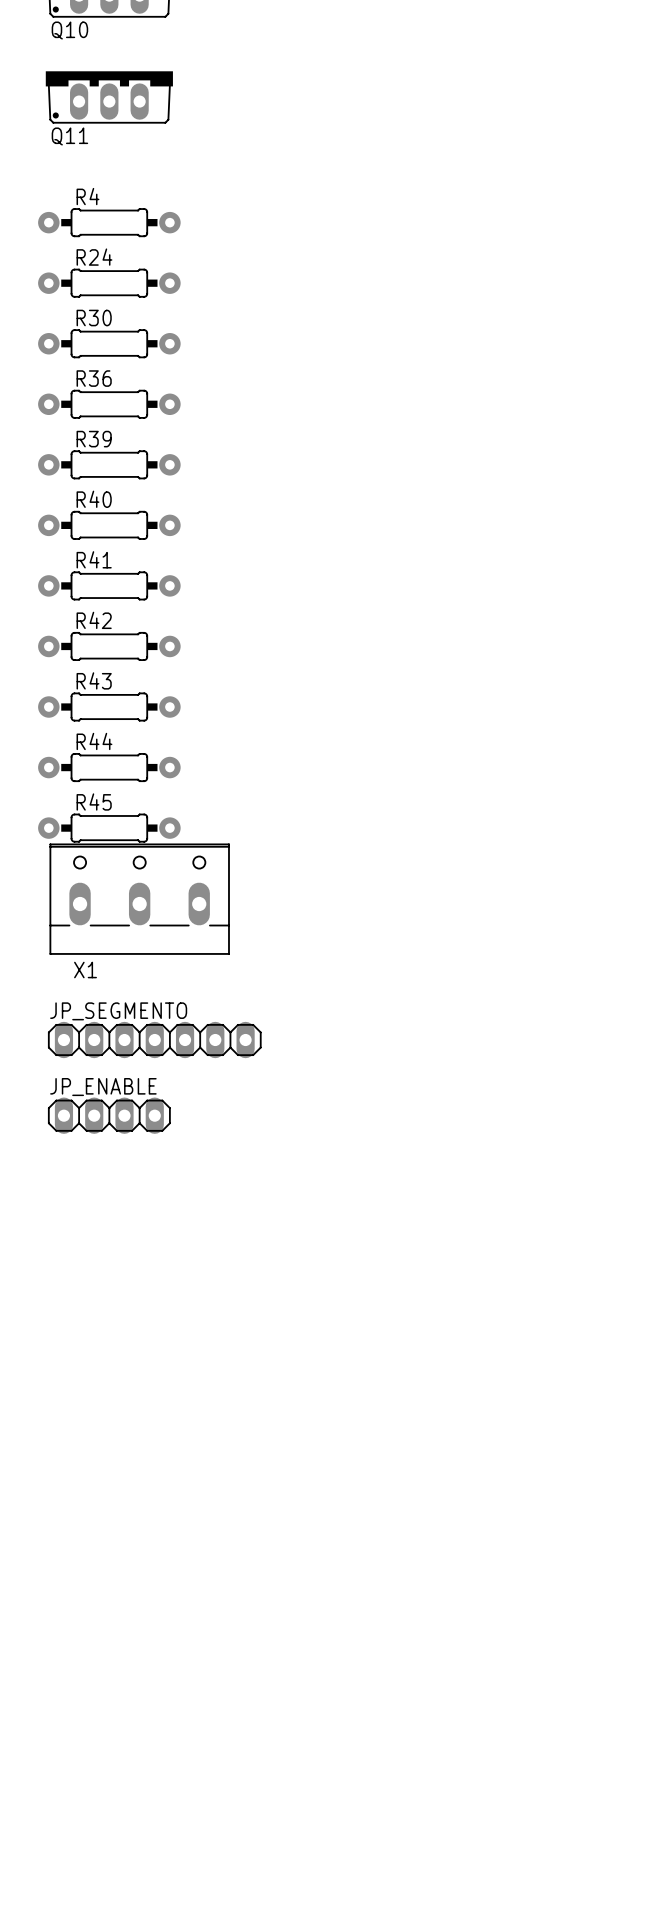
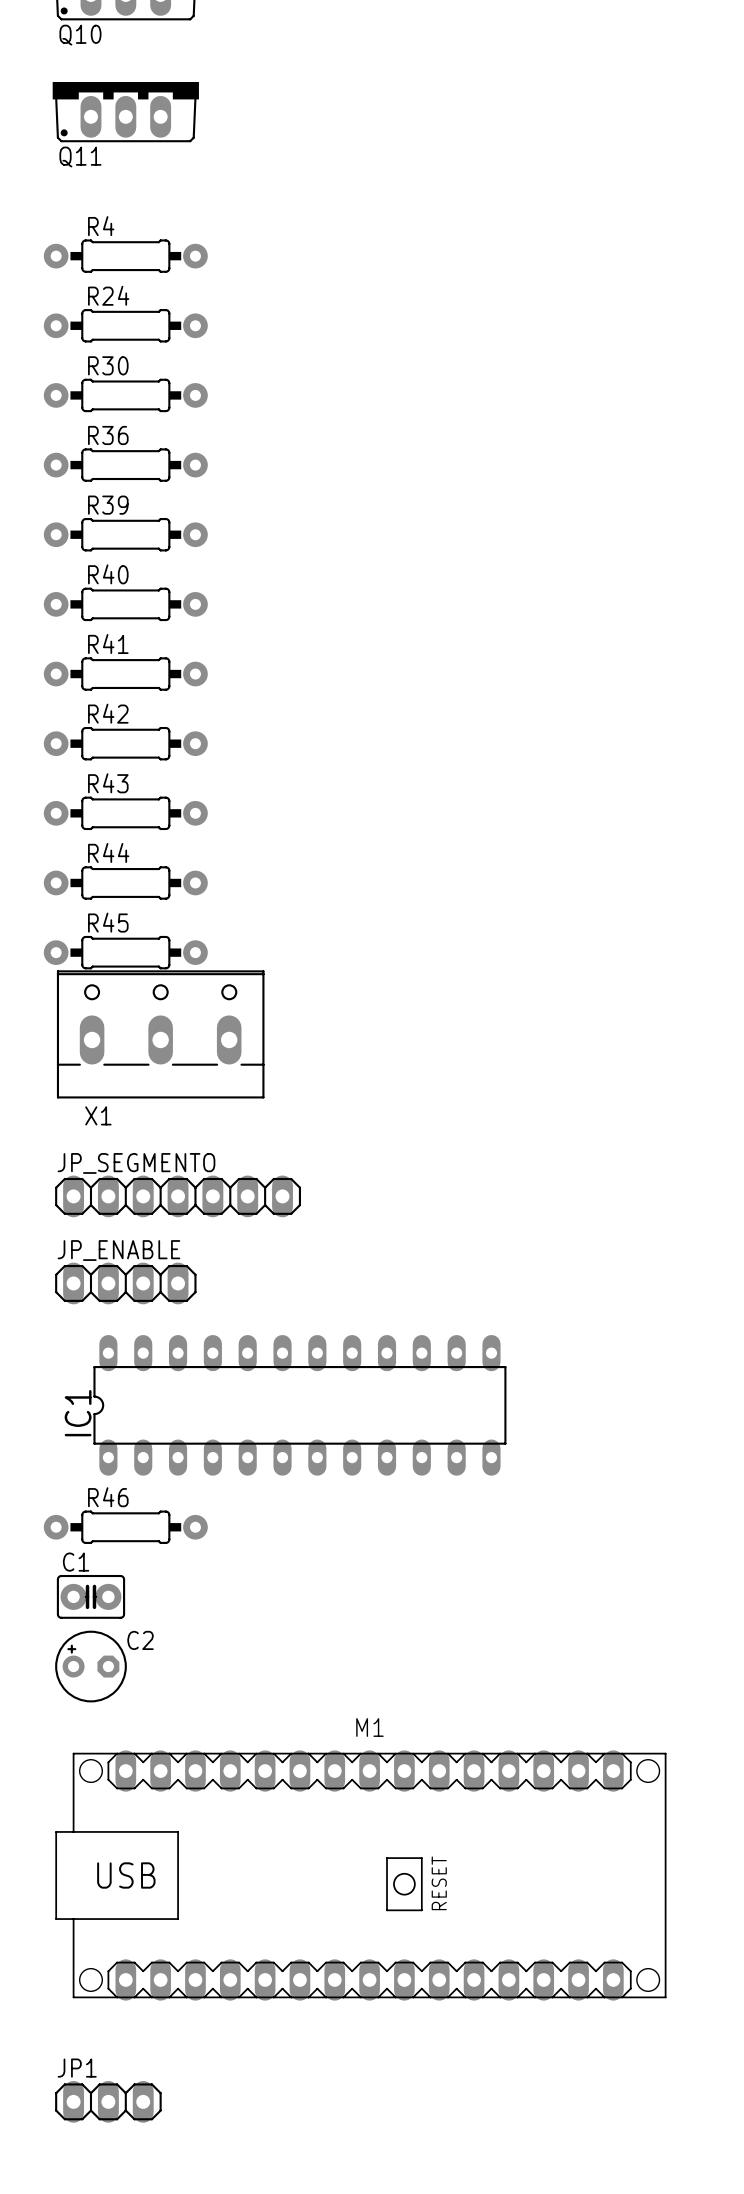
IC1: none -> (299, 1405)
R46: none -> (125, 1527)
C1: none -> (90, 1596)
C2: none -> (90, 1666)
M1: none -> (360, 1875)
JP1: none -> (108, 2101)

